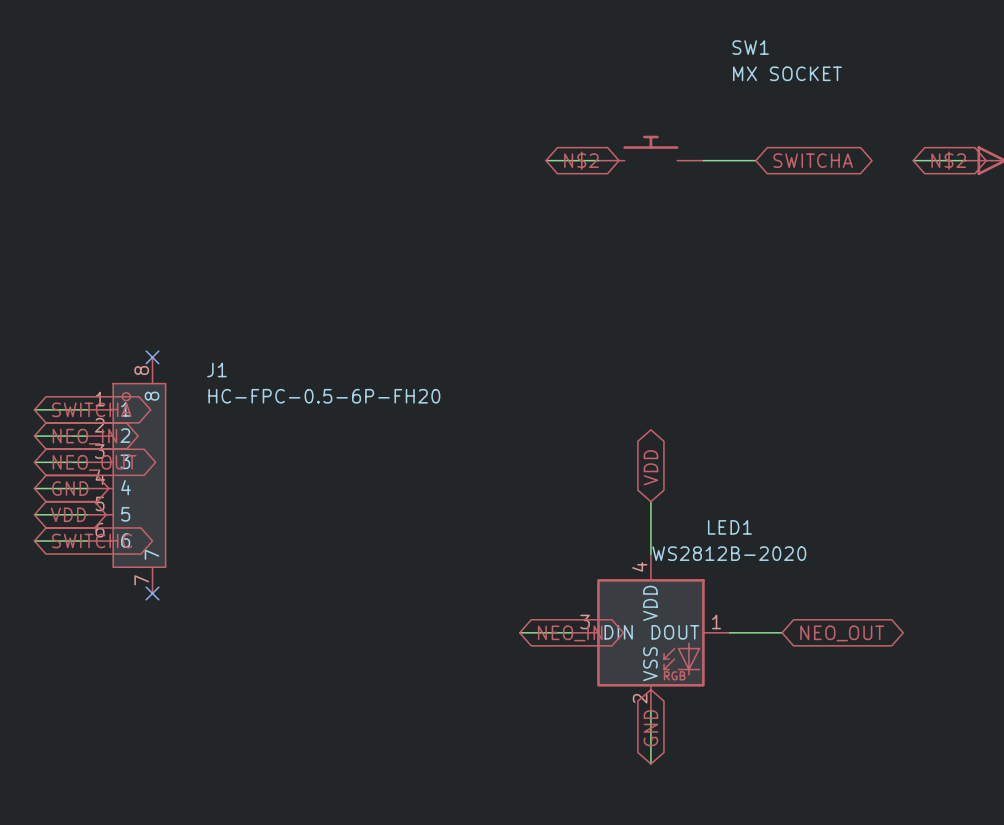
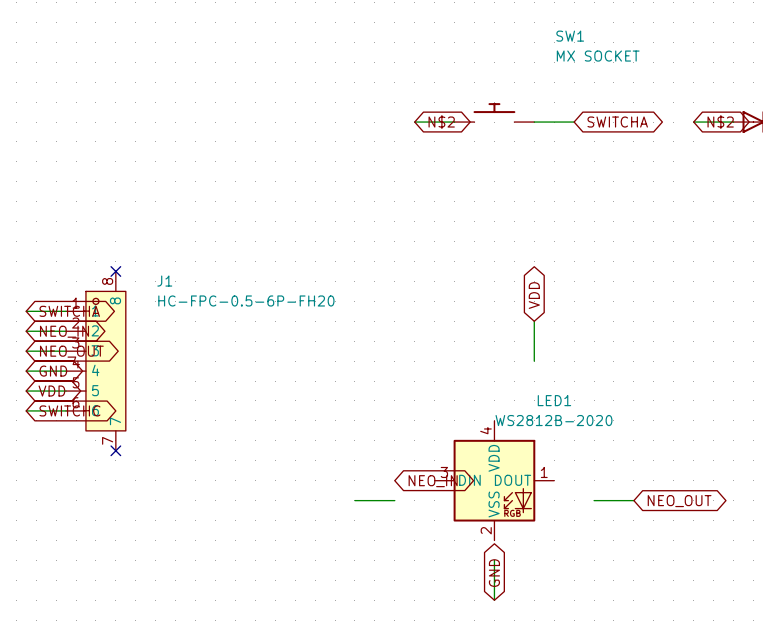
global label position: VDD (650, 467) -> VDD (534, 295)
wire: (650, 501) (650, 554) -> (534, 321) (534, 361)
wire: (519, 632) (572, 632) -> (354, 500) (394, 500)
wire: (729, 632) (782, 632) -> (594, 500) (633, 500)
global label position: NEO_OUT (842, 633) -> NEO_OUT (679, 501)
wire: (650, 711) (650, 737) -> (494, 580) (494, 600)
global label position: GND (650, 728) -> GND (494, 573)

